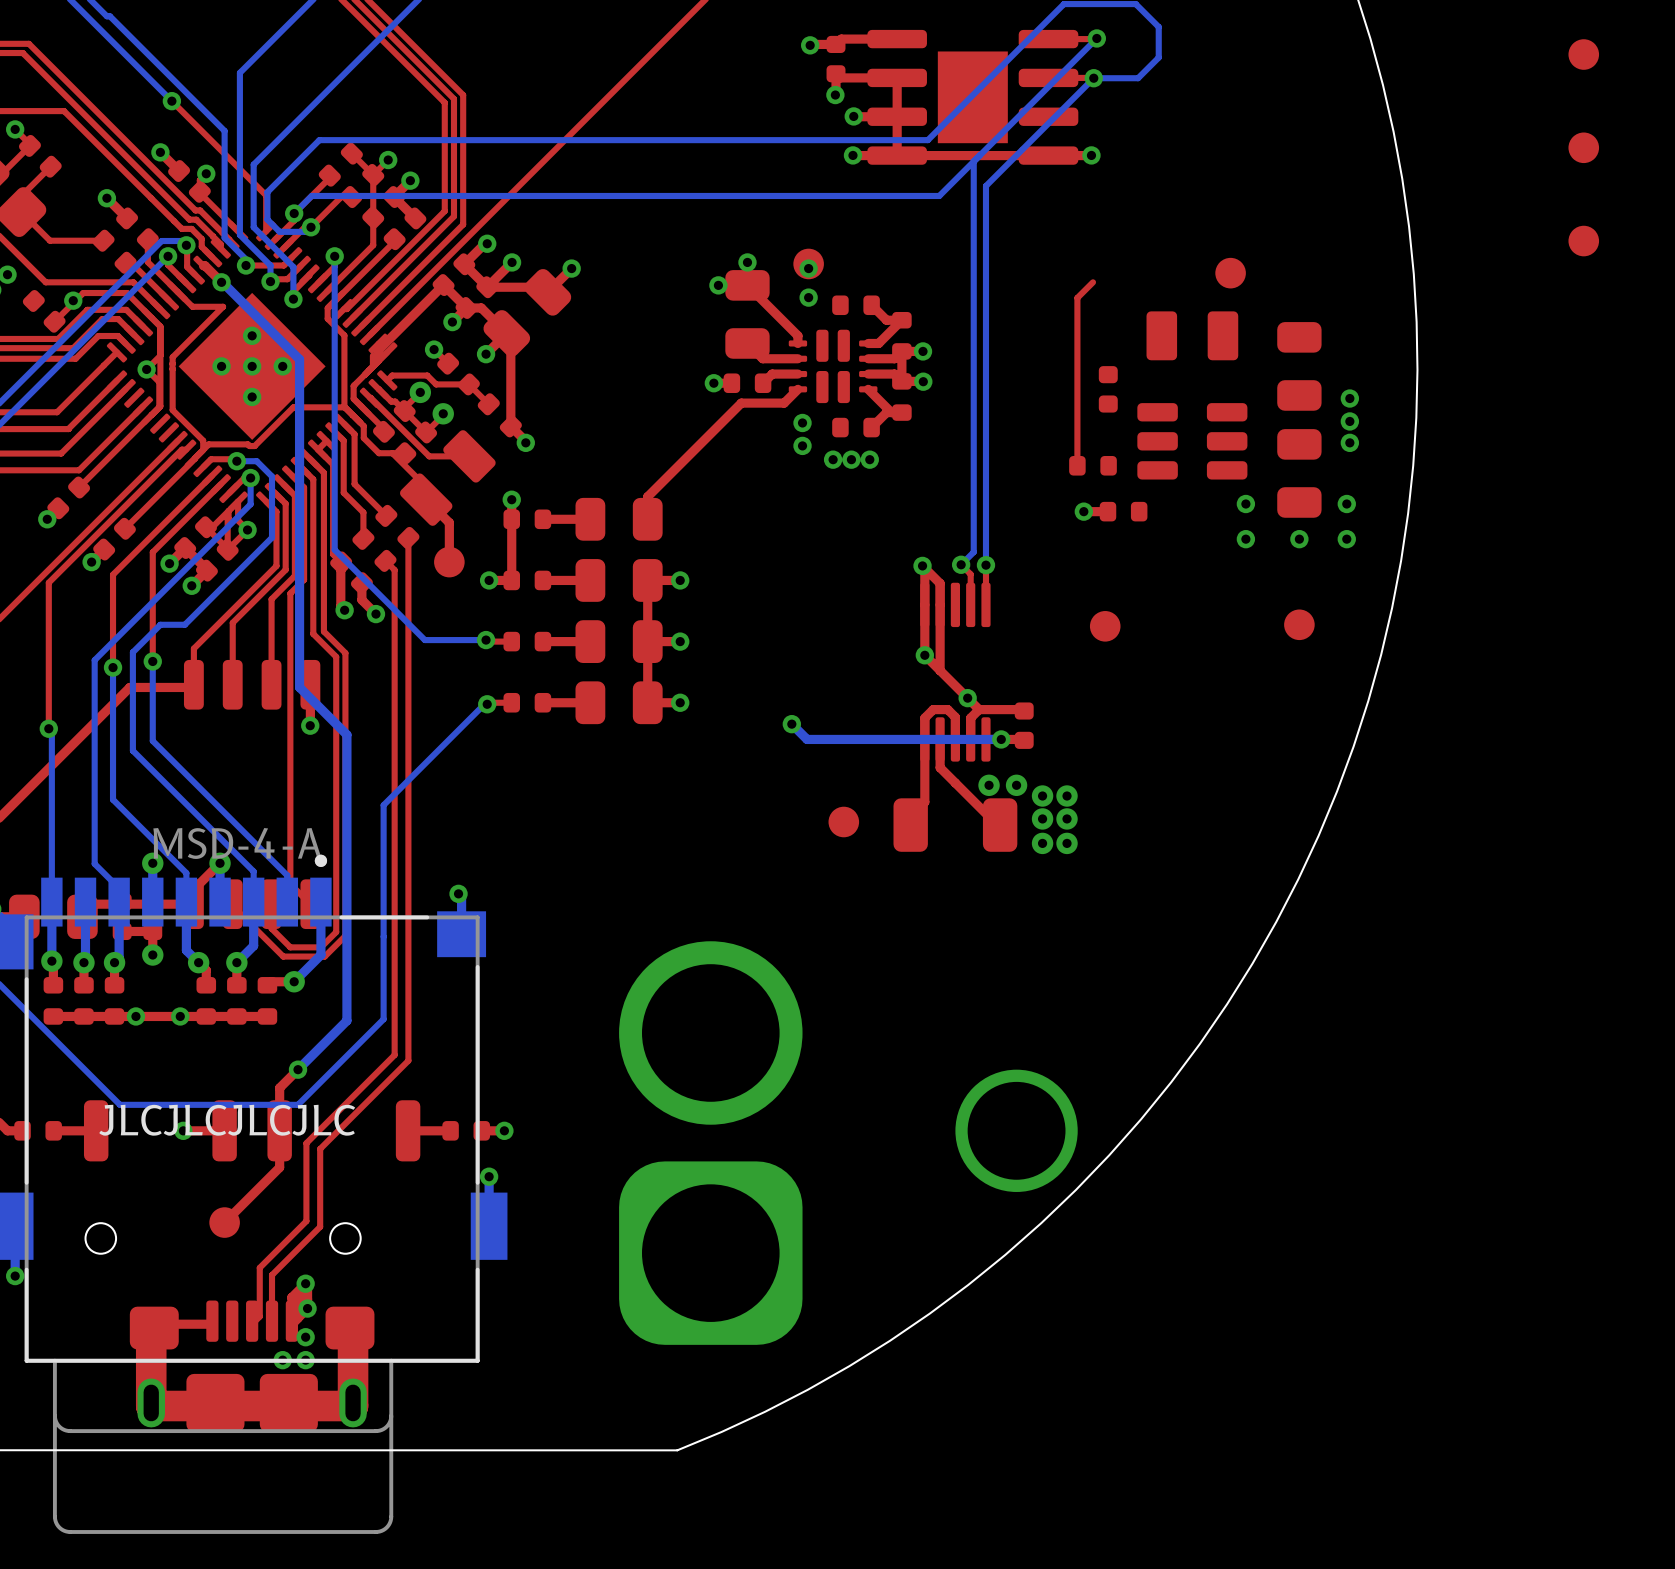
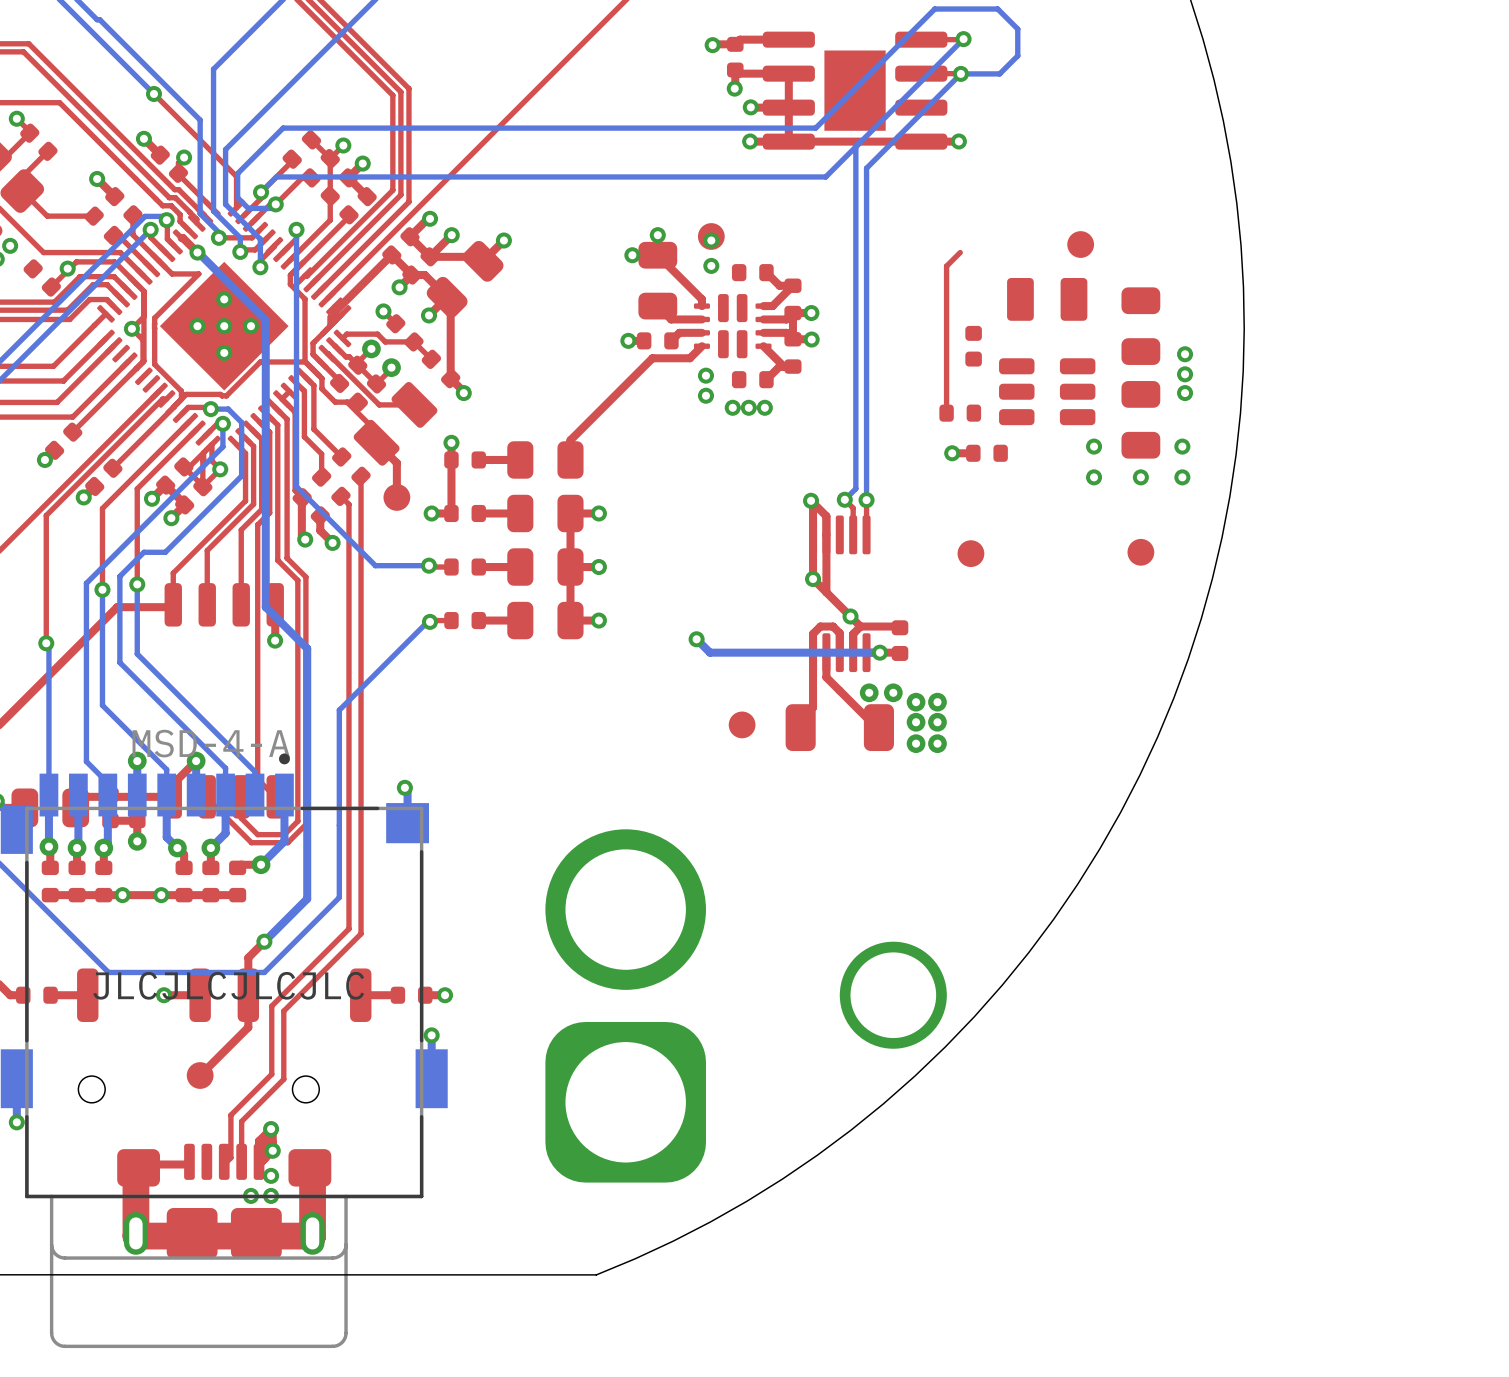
part: (1583, 54) -> none
part: (1583, 147) -> none
part: (1583, 241) -> none

